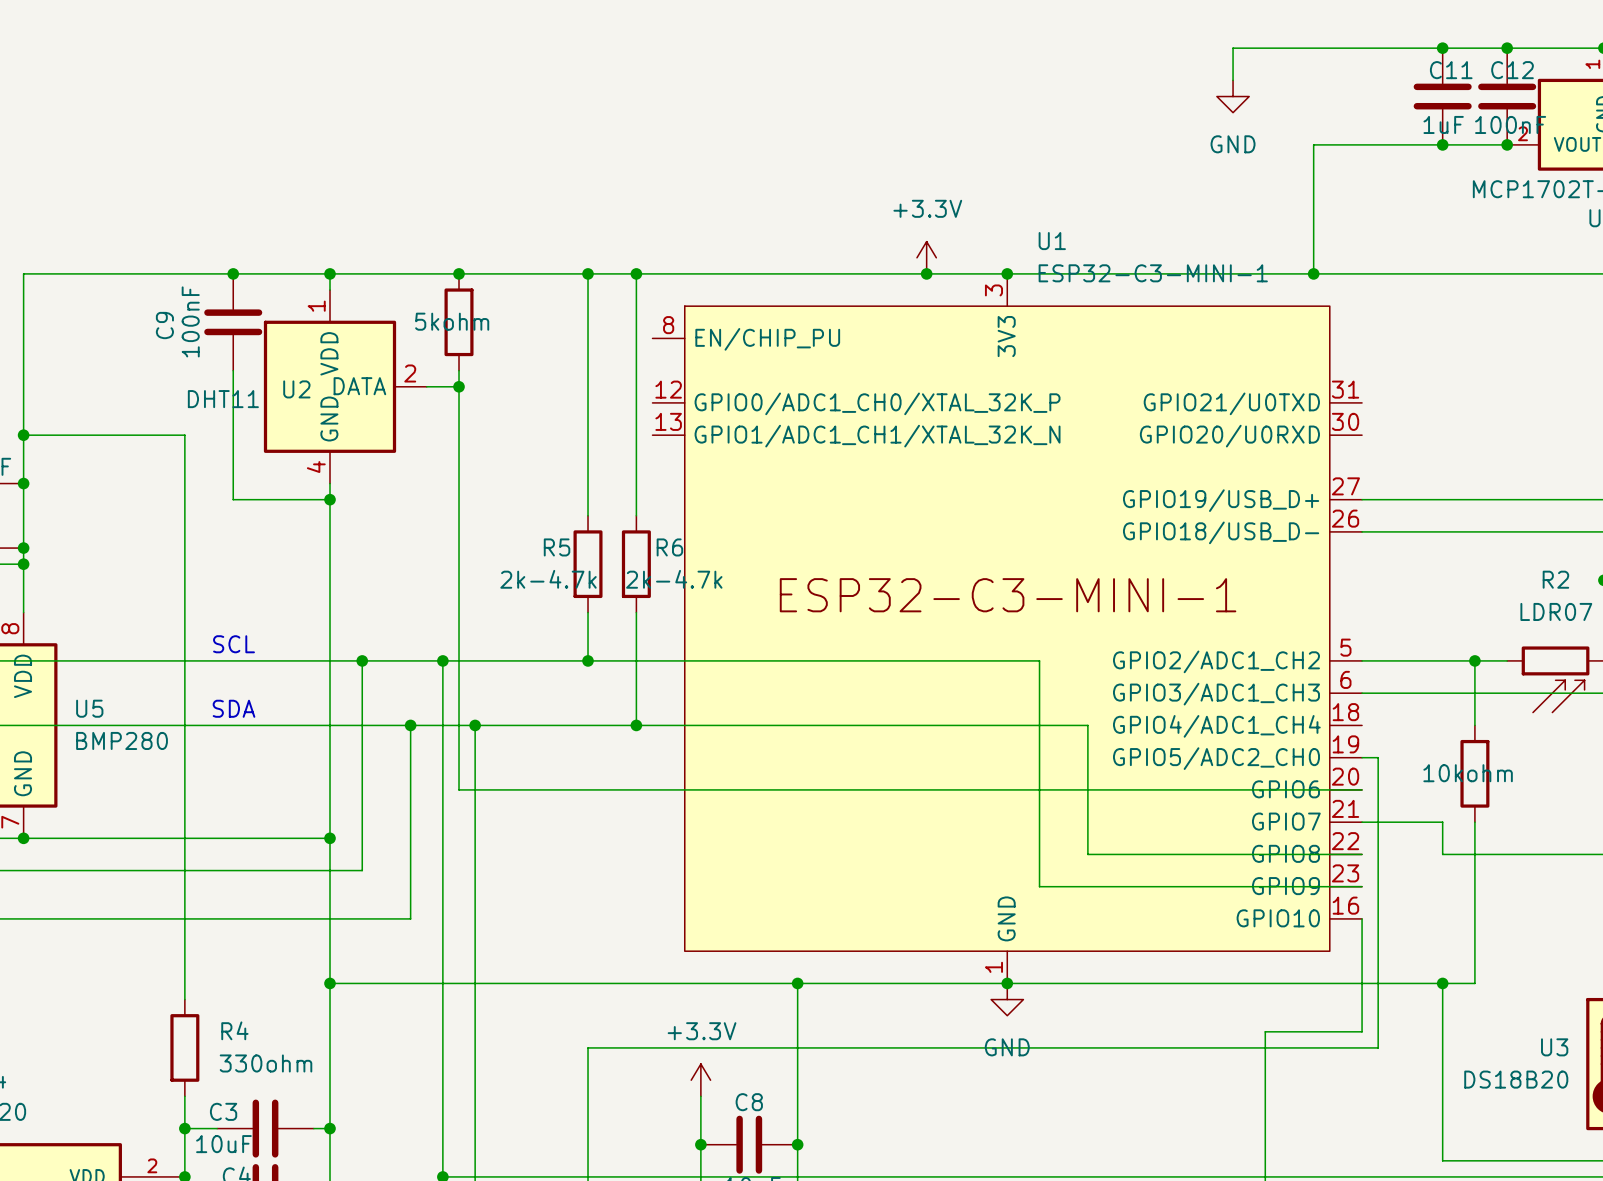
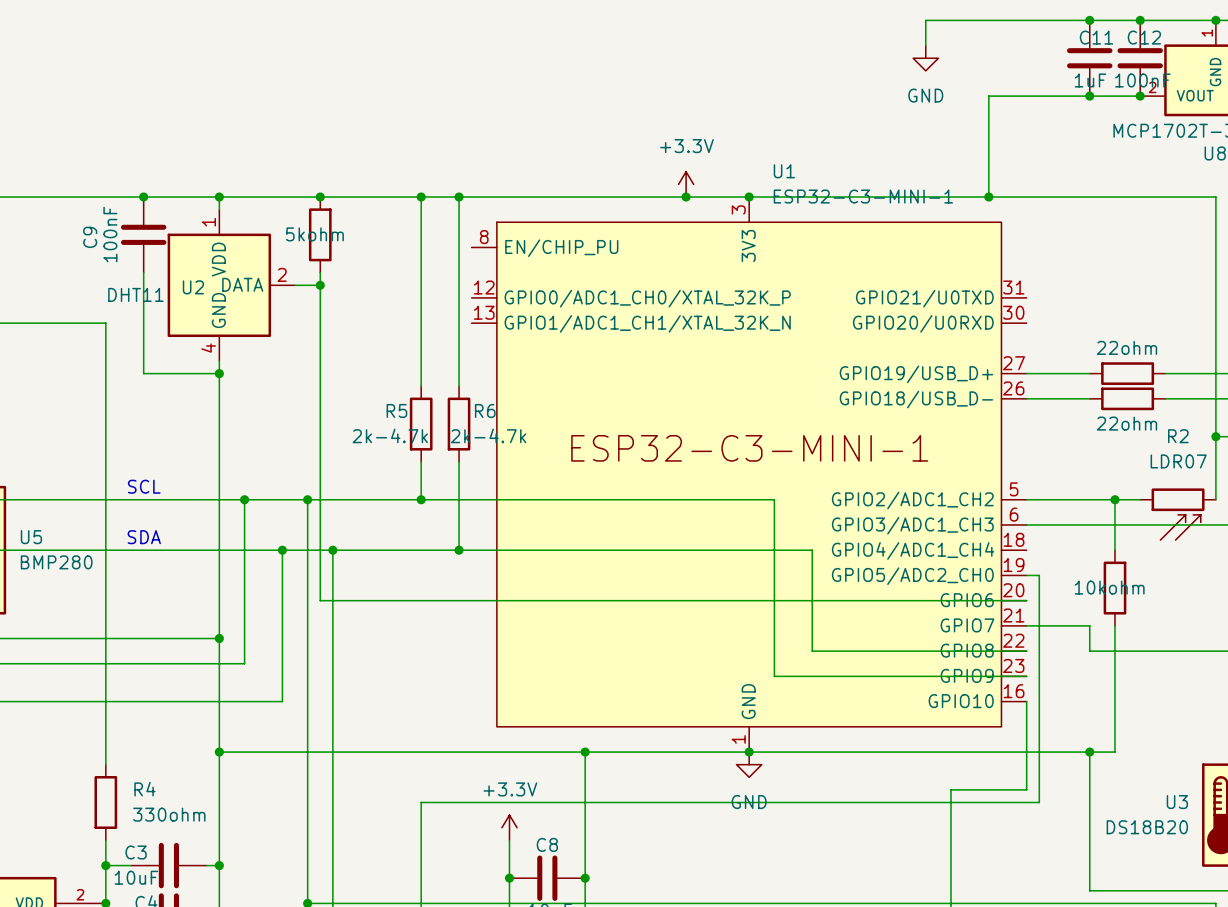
wire: (1442, 499) (1539, 499) -> none
part: none -> 22ohm (1127, 373)
wire: (1442, 531) (1539, 531) -> none
part: none -> 22ohm (1127, 398)

